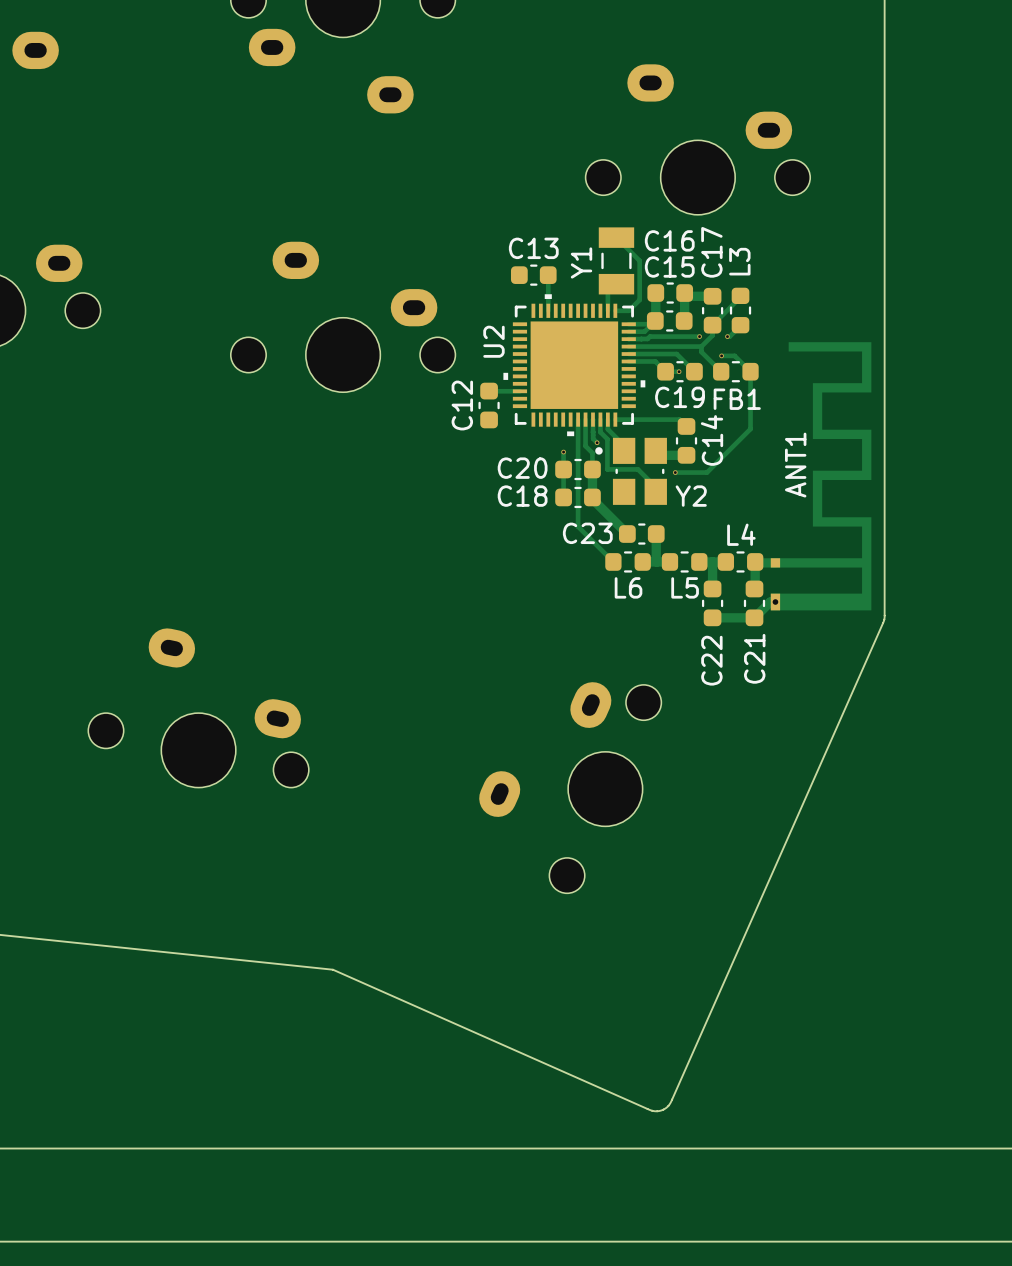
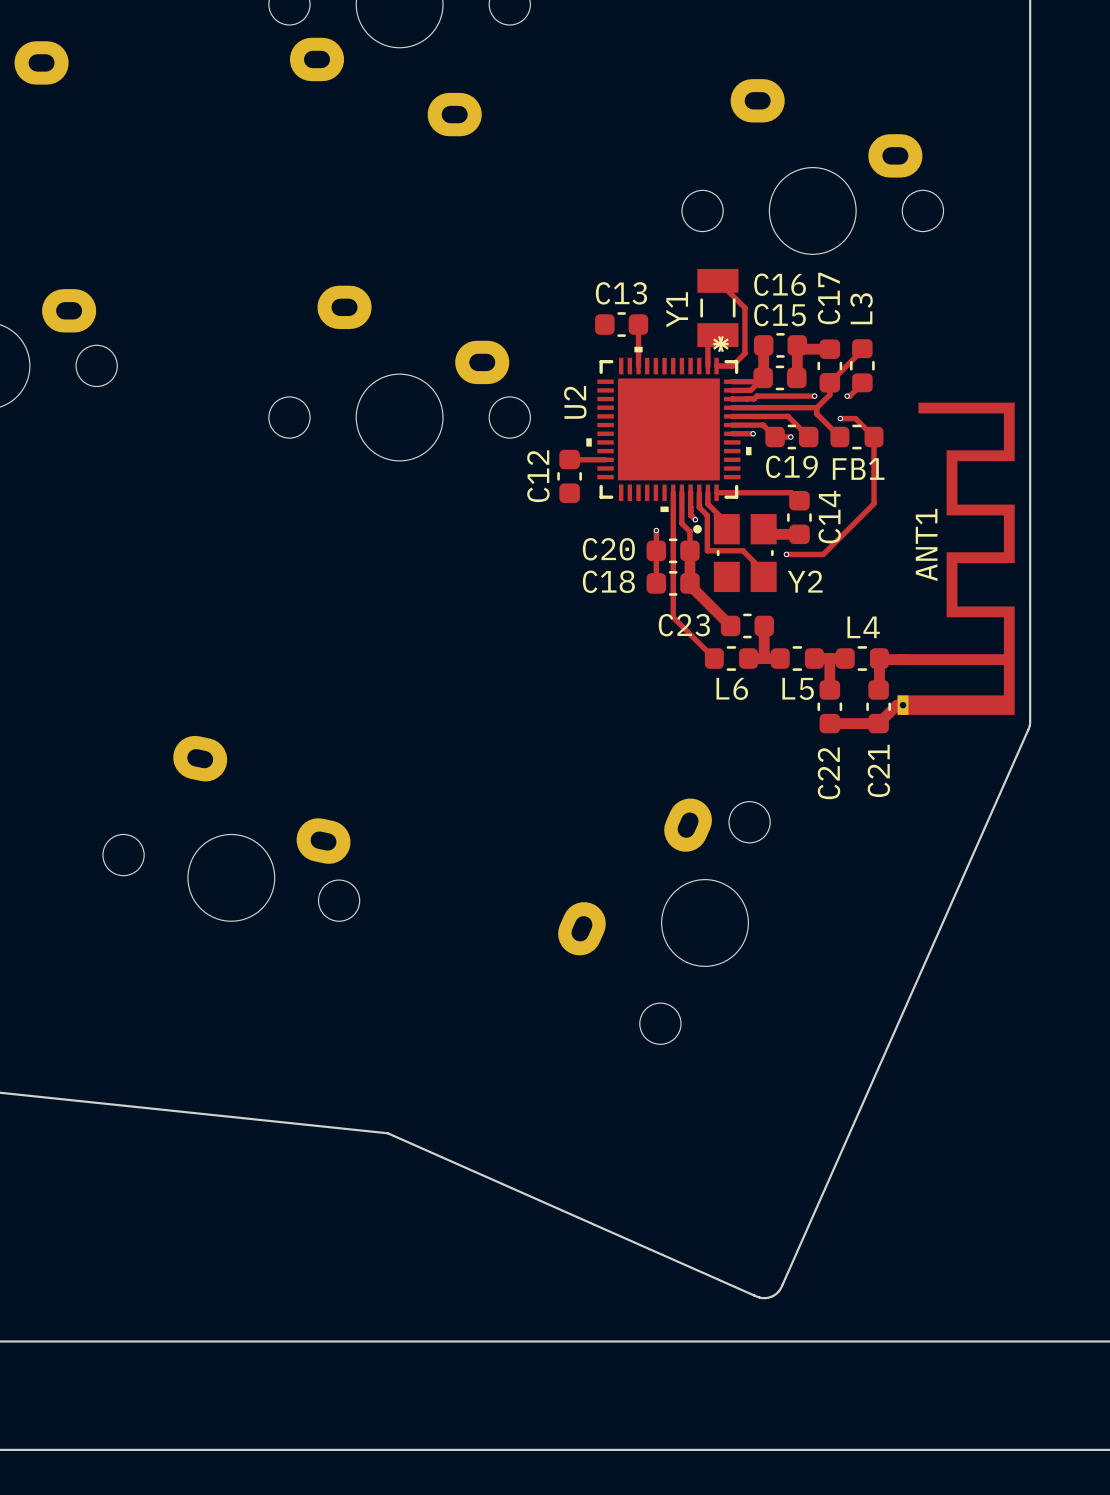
U2 footprint: [503, 294, 646, 437] -> [586, 346, 752, 513]
track: none -> (732, 433) (753, 433)
via: none -> (753, 433)

